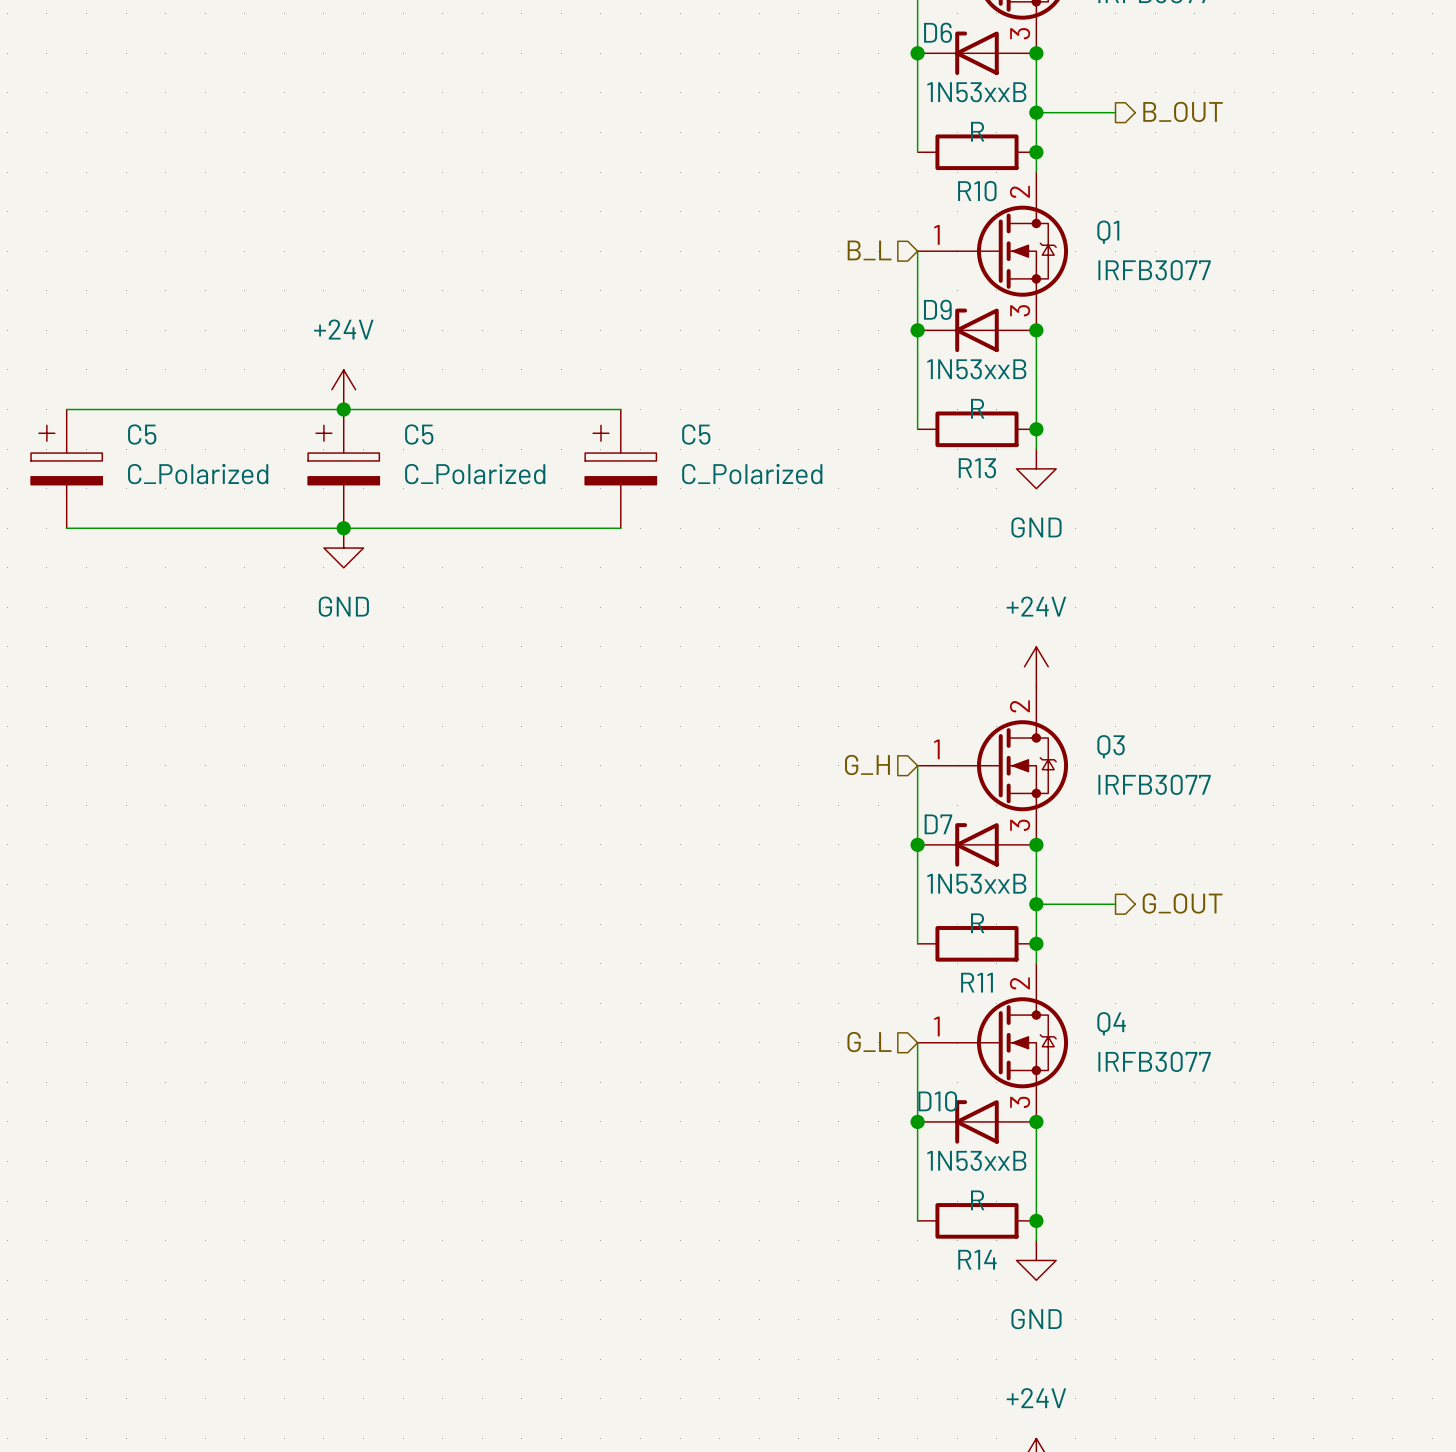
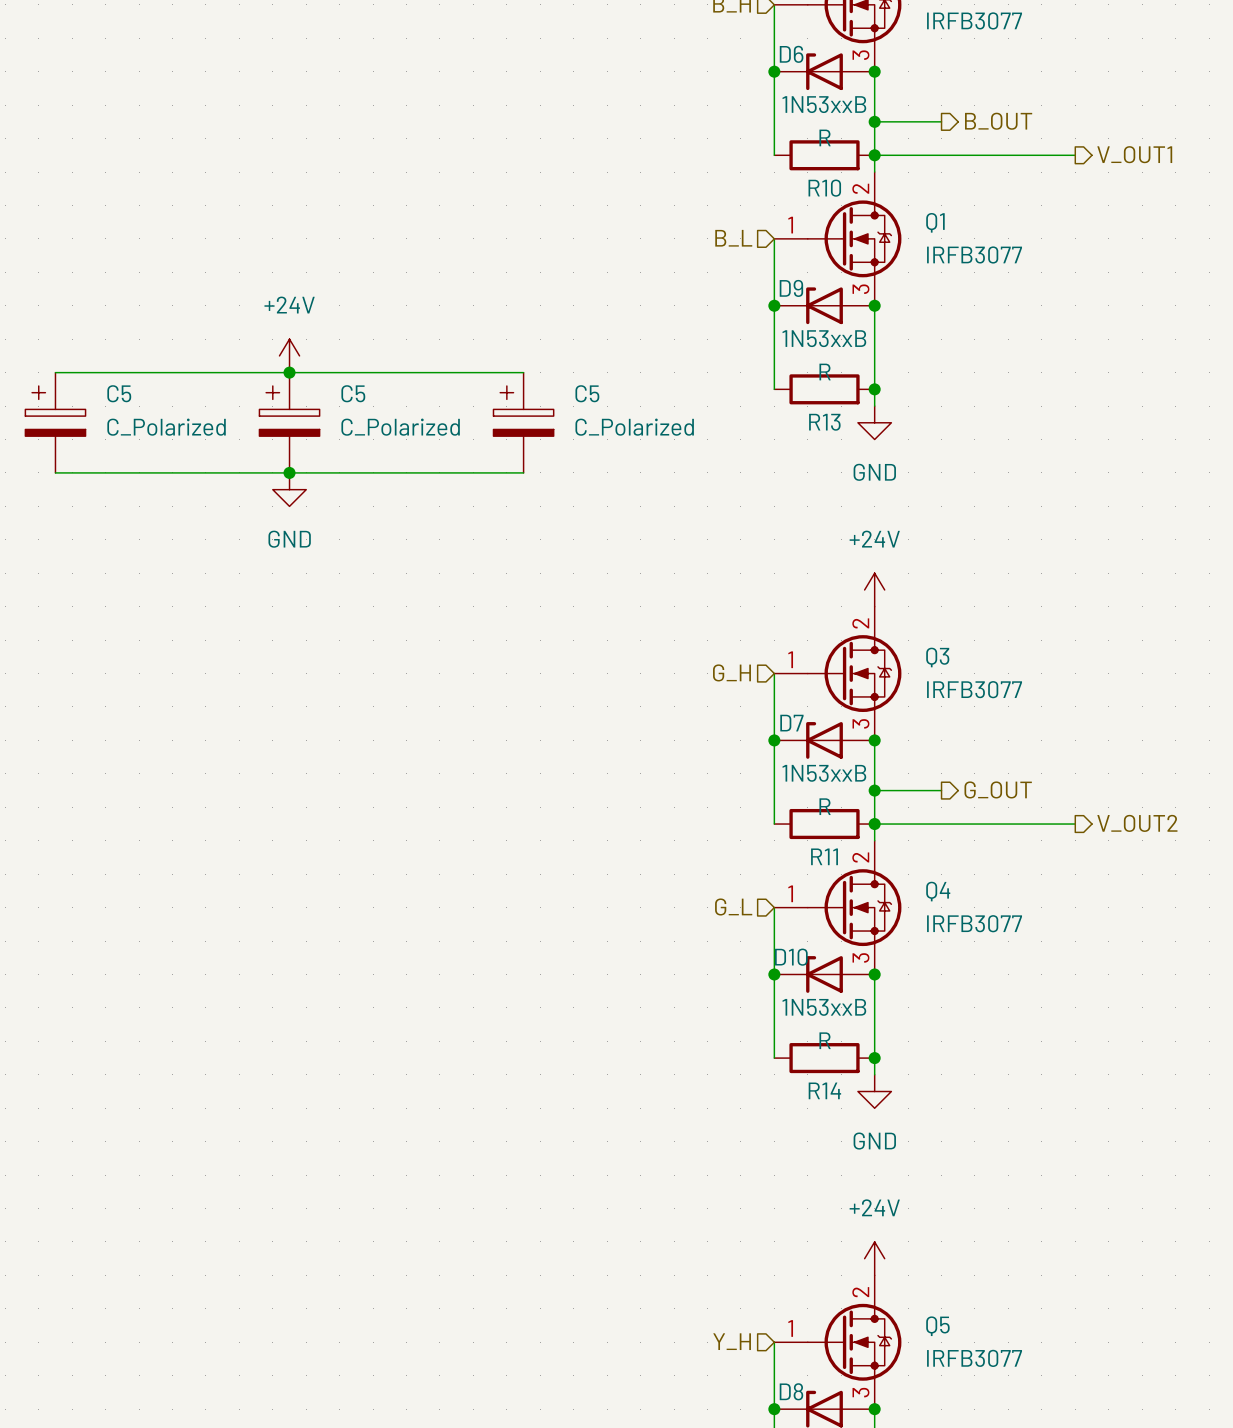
hierarchical label: none -> V_OUT1 (1134, 154)
wire: none -> (874, 155) (1075, 155)
wire: none -> (874, 824) (1075, 824)
hierarchical label: none -> V_OUT2 (1137, 823)

